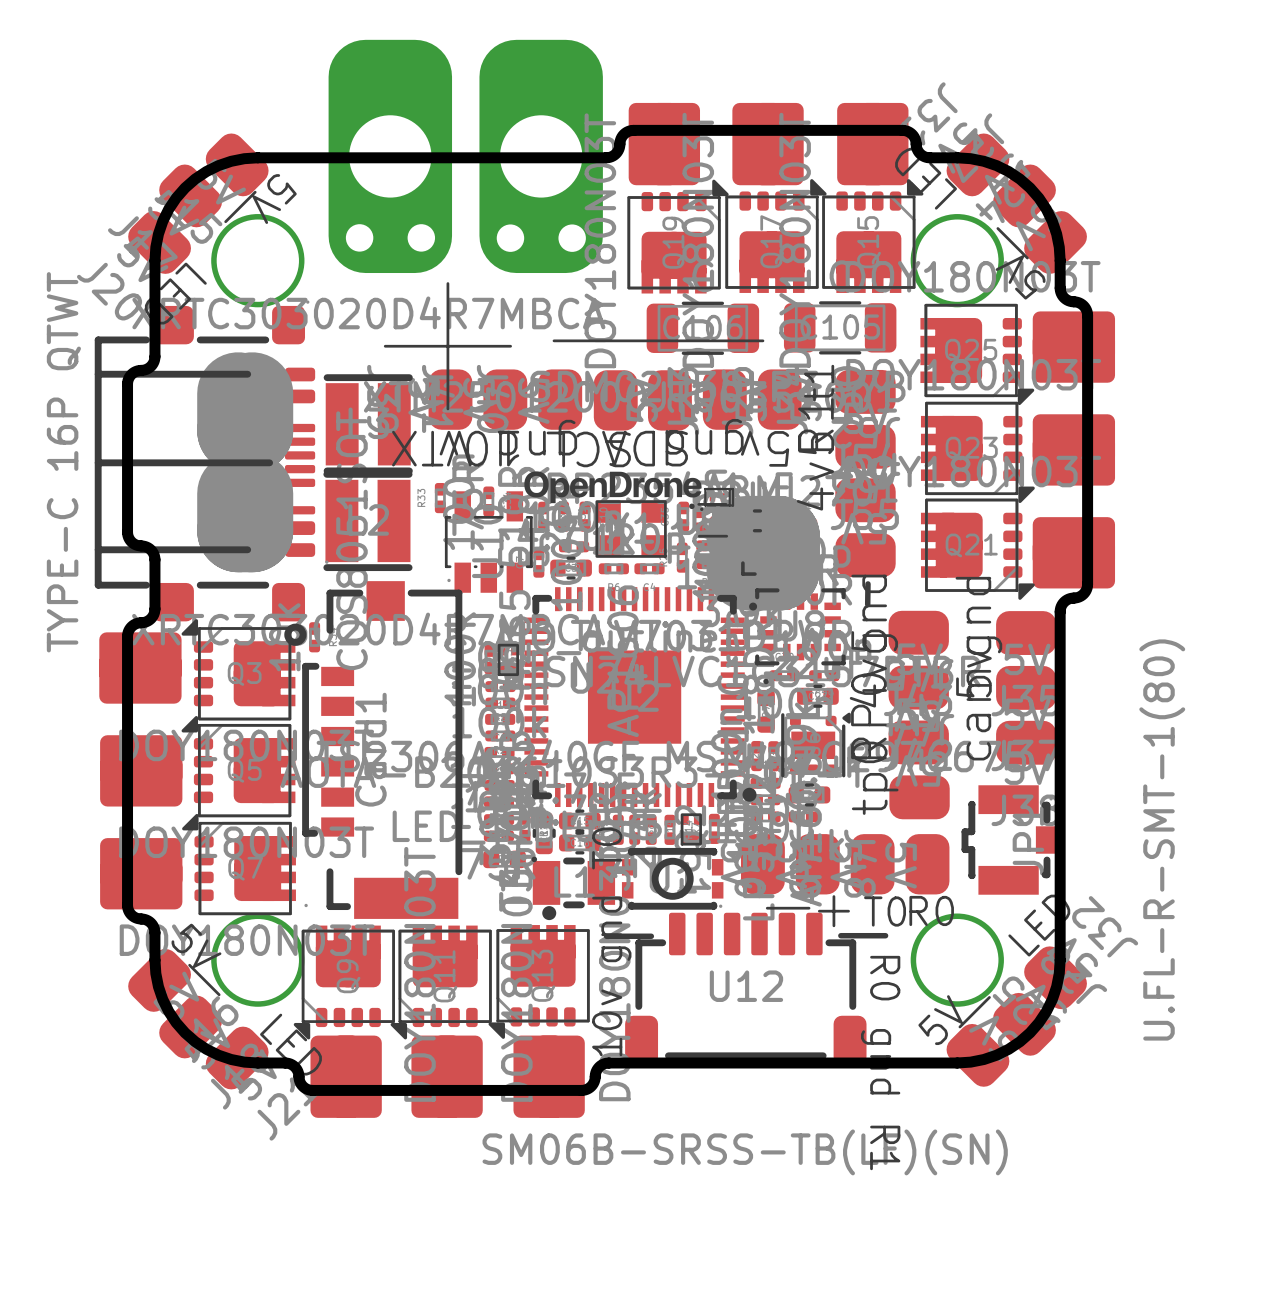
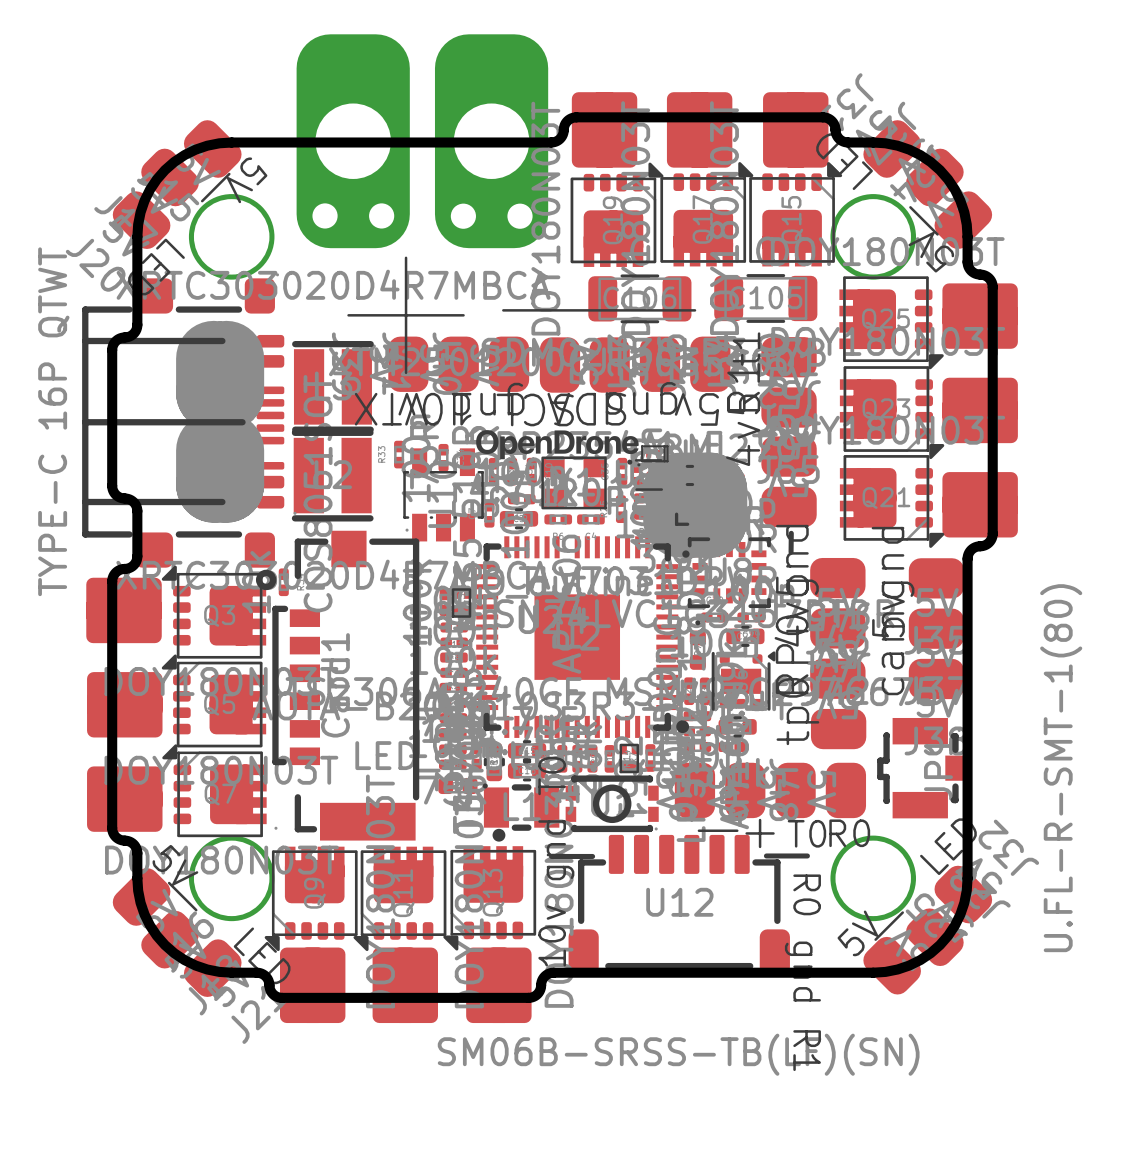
part footprint: [524, 587, 757, 808] -> [476, 536, 690, 738]

